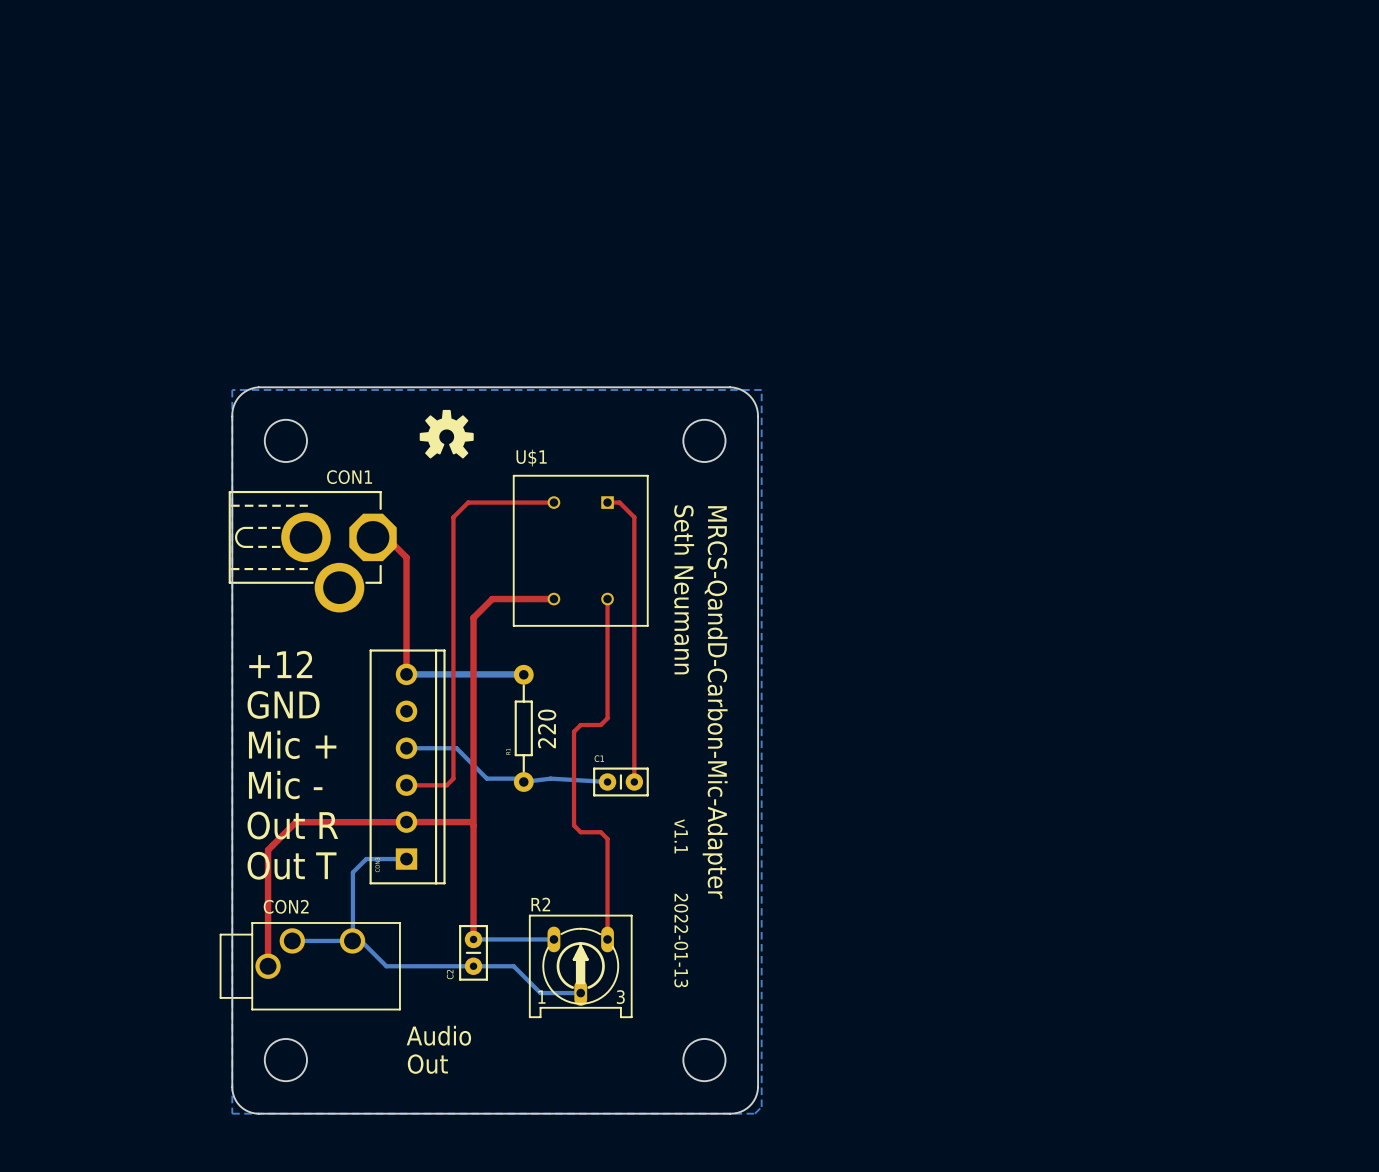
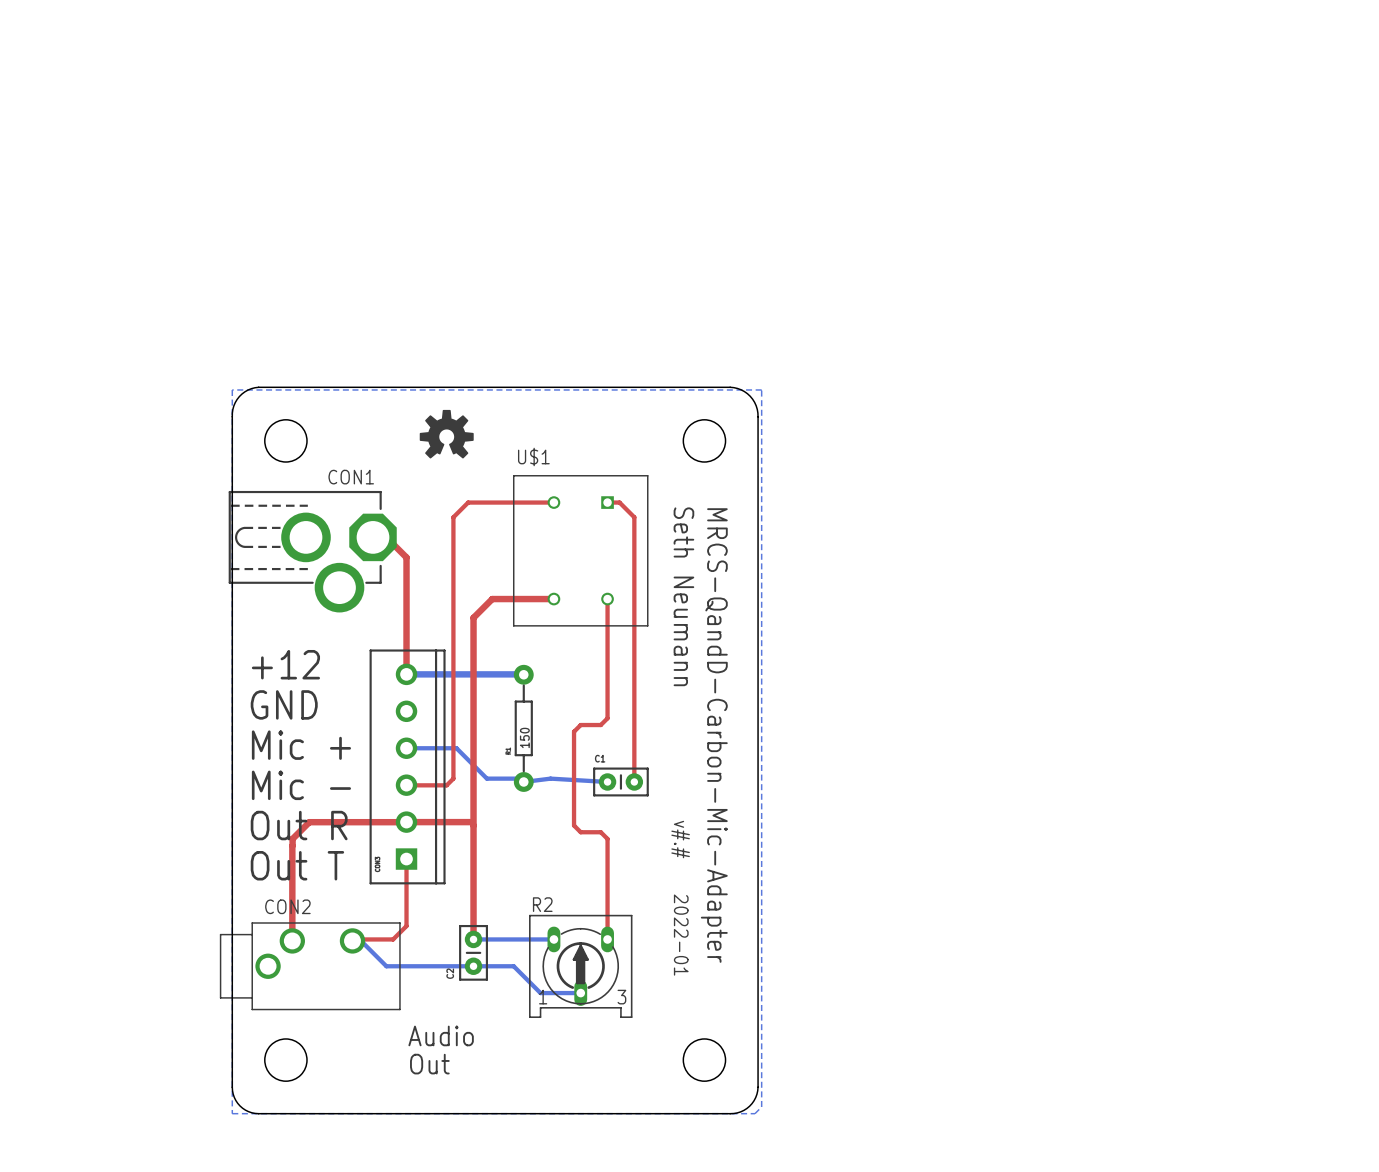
part value: 220 (547, 728) -> 150 (524, 737)
top track: (309, 822) (295, 822) (268, 850) (268, 966) -> (309, 822) (292, 838) (292, 940)
text: v1.1 (681, 836) -> v#.# (680, 839)
top track: none -> (406, 859) (406, 926) (393, 939) (352, 940)
bottom track: (406, 859) (366, 859) (352, 872) (352, 940) (292, 940) -> none
text: 2022-01-13 (681, 940) -> 2022-01 (681, 935)

